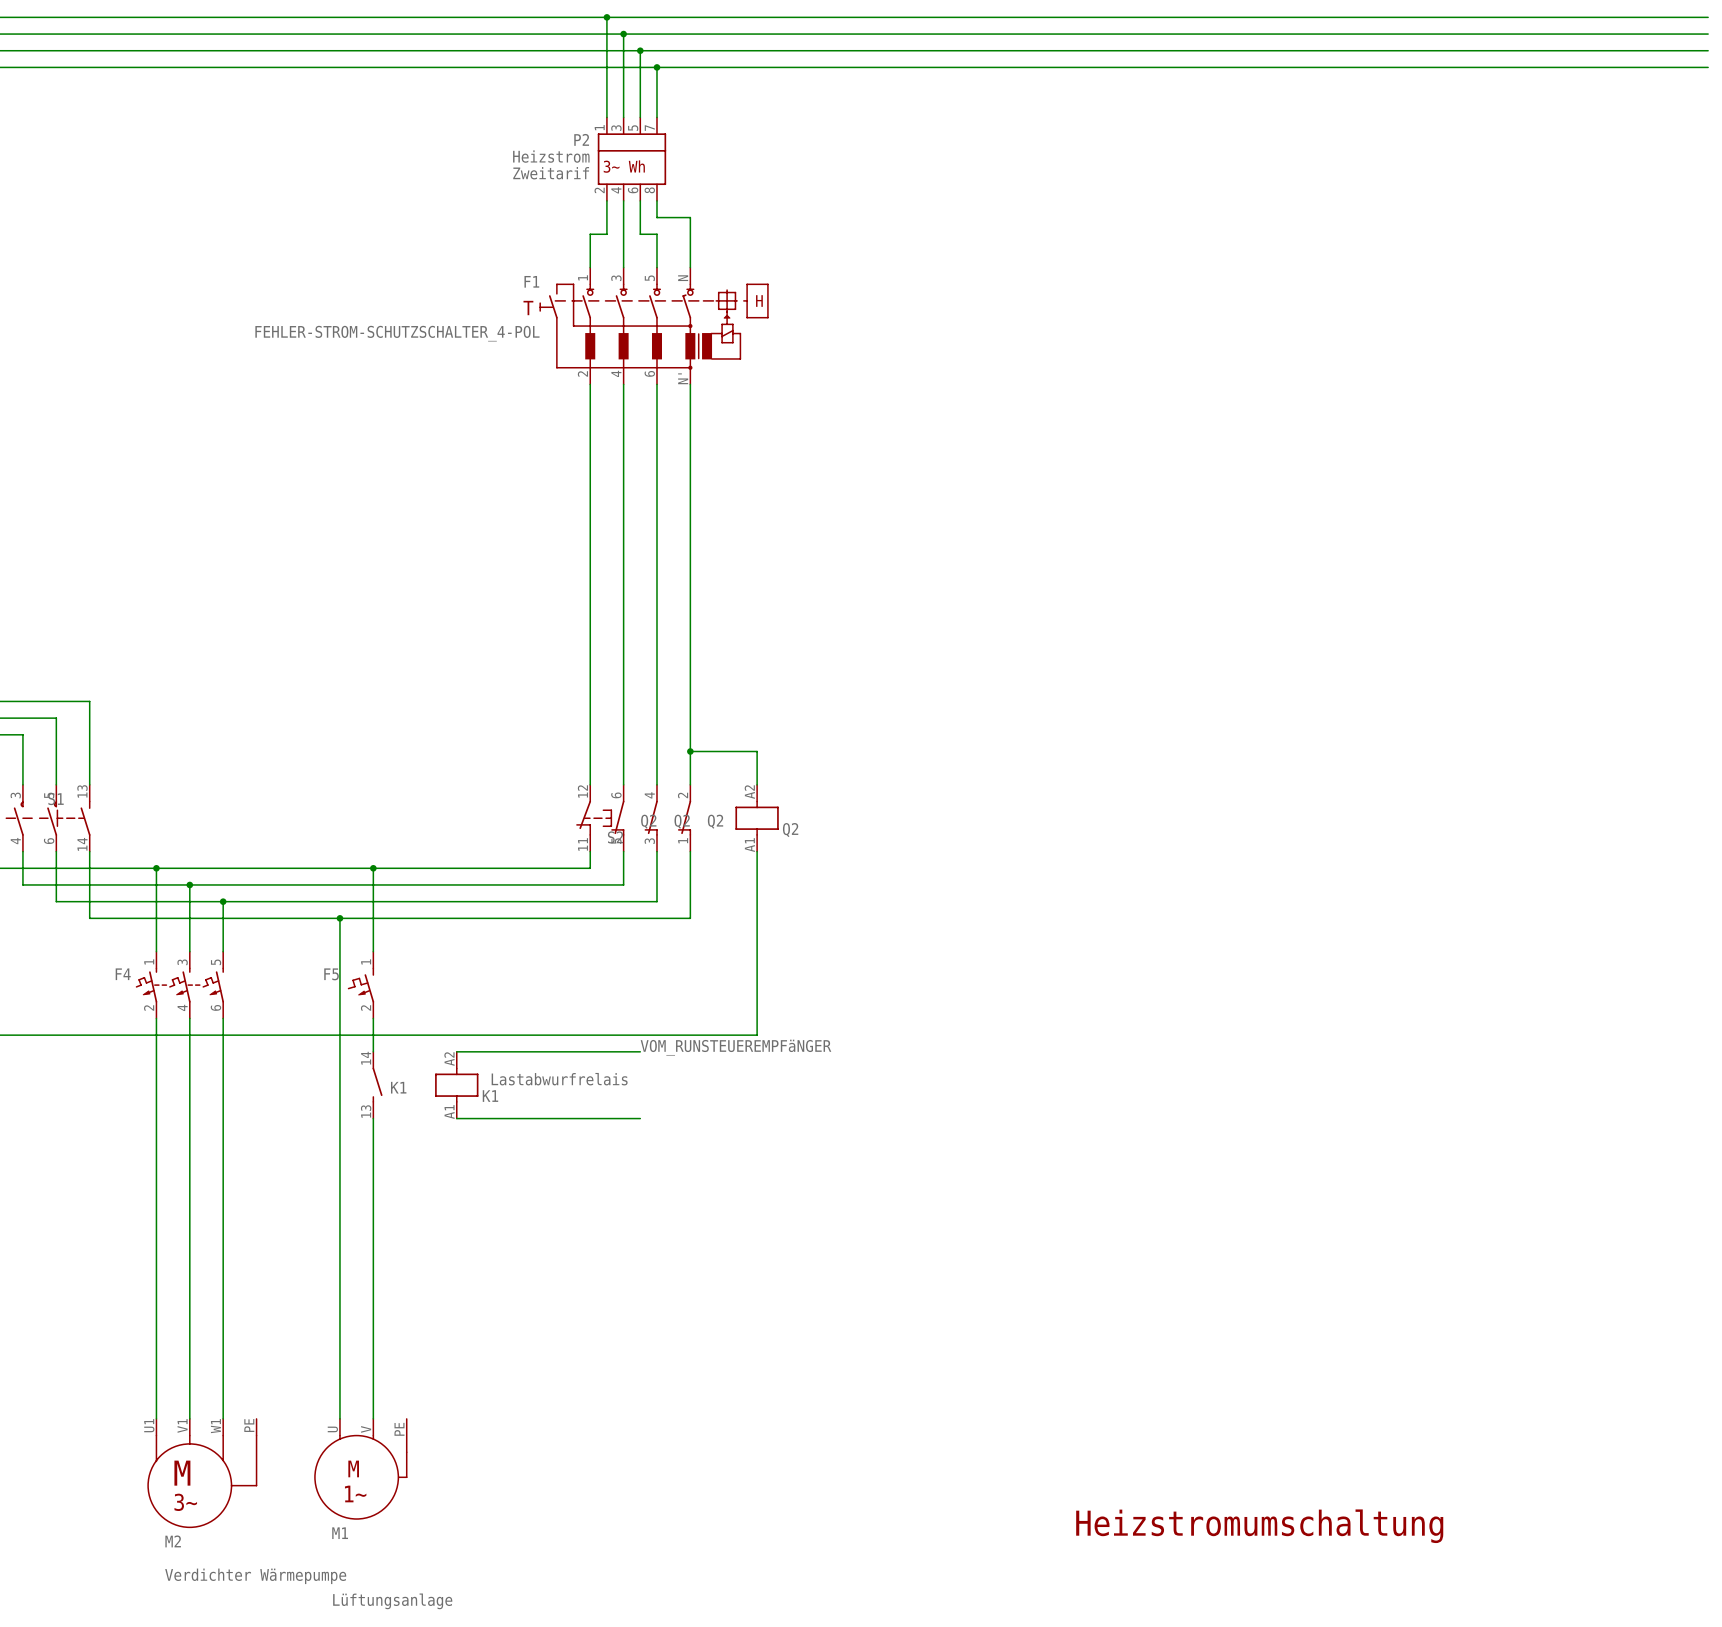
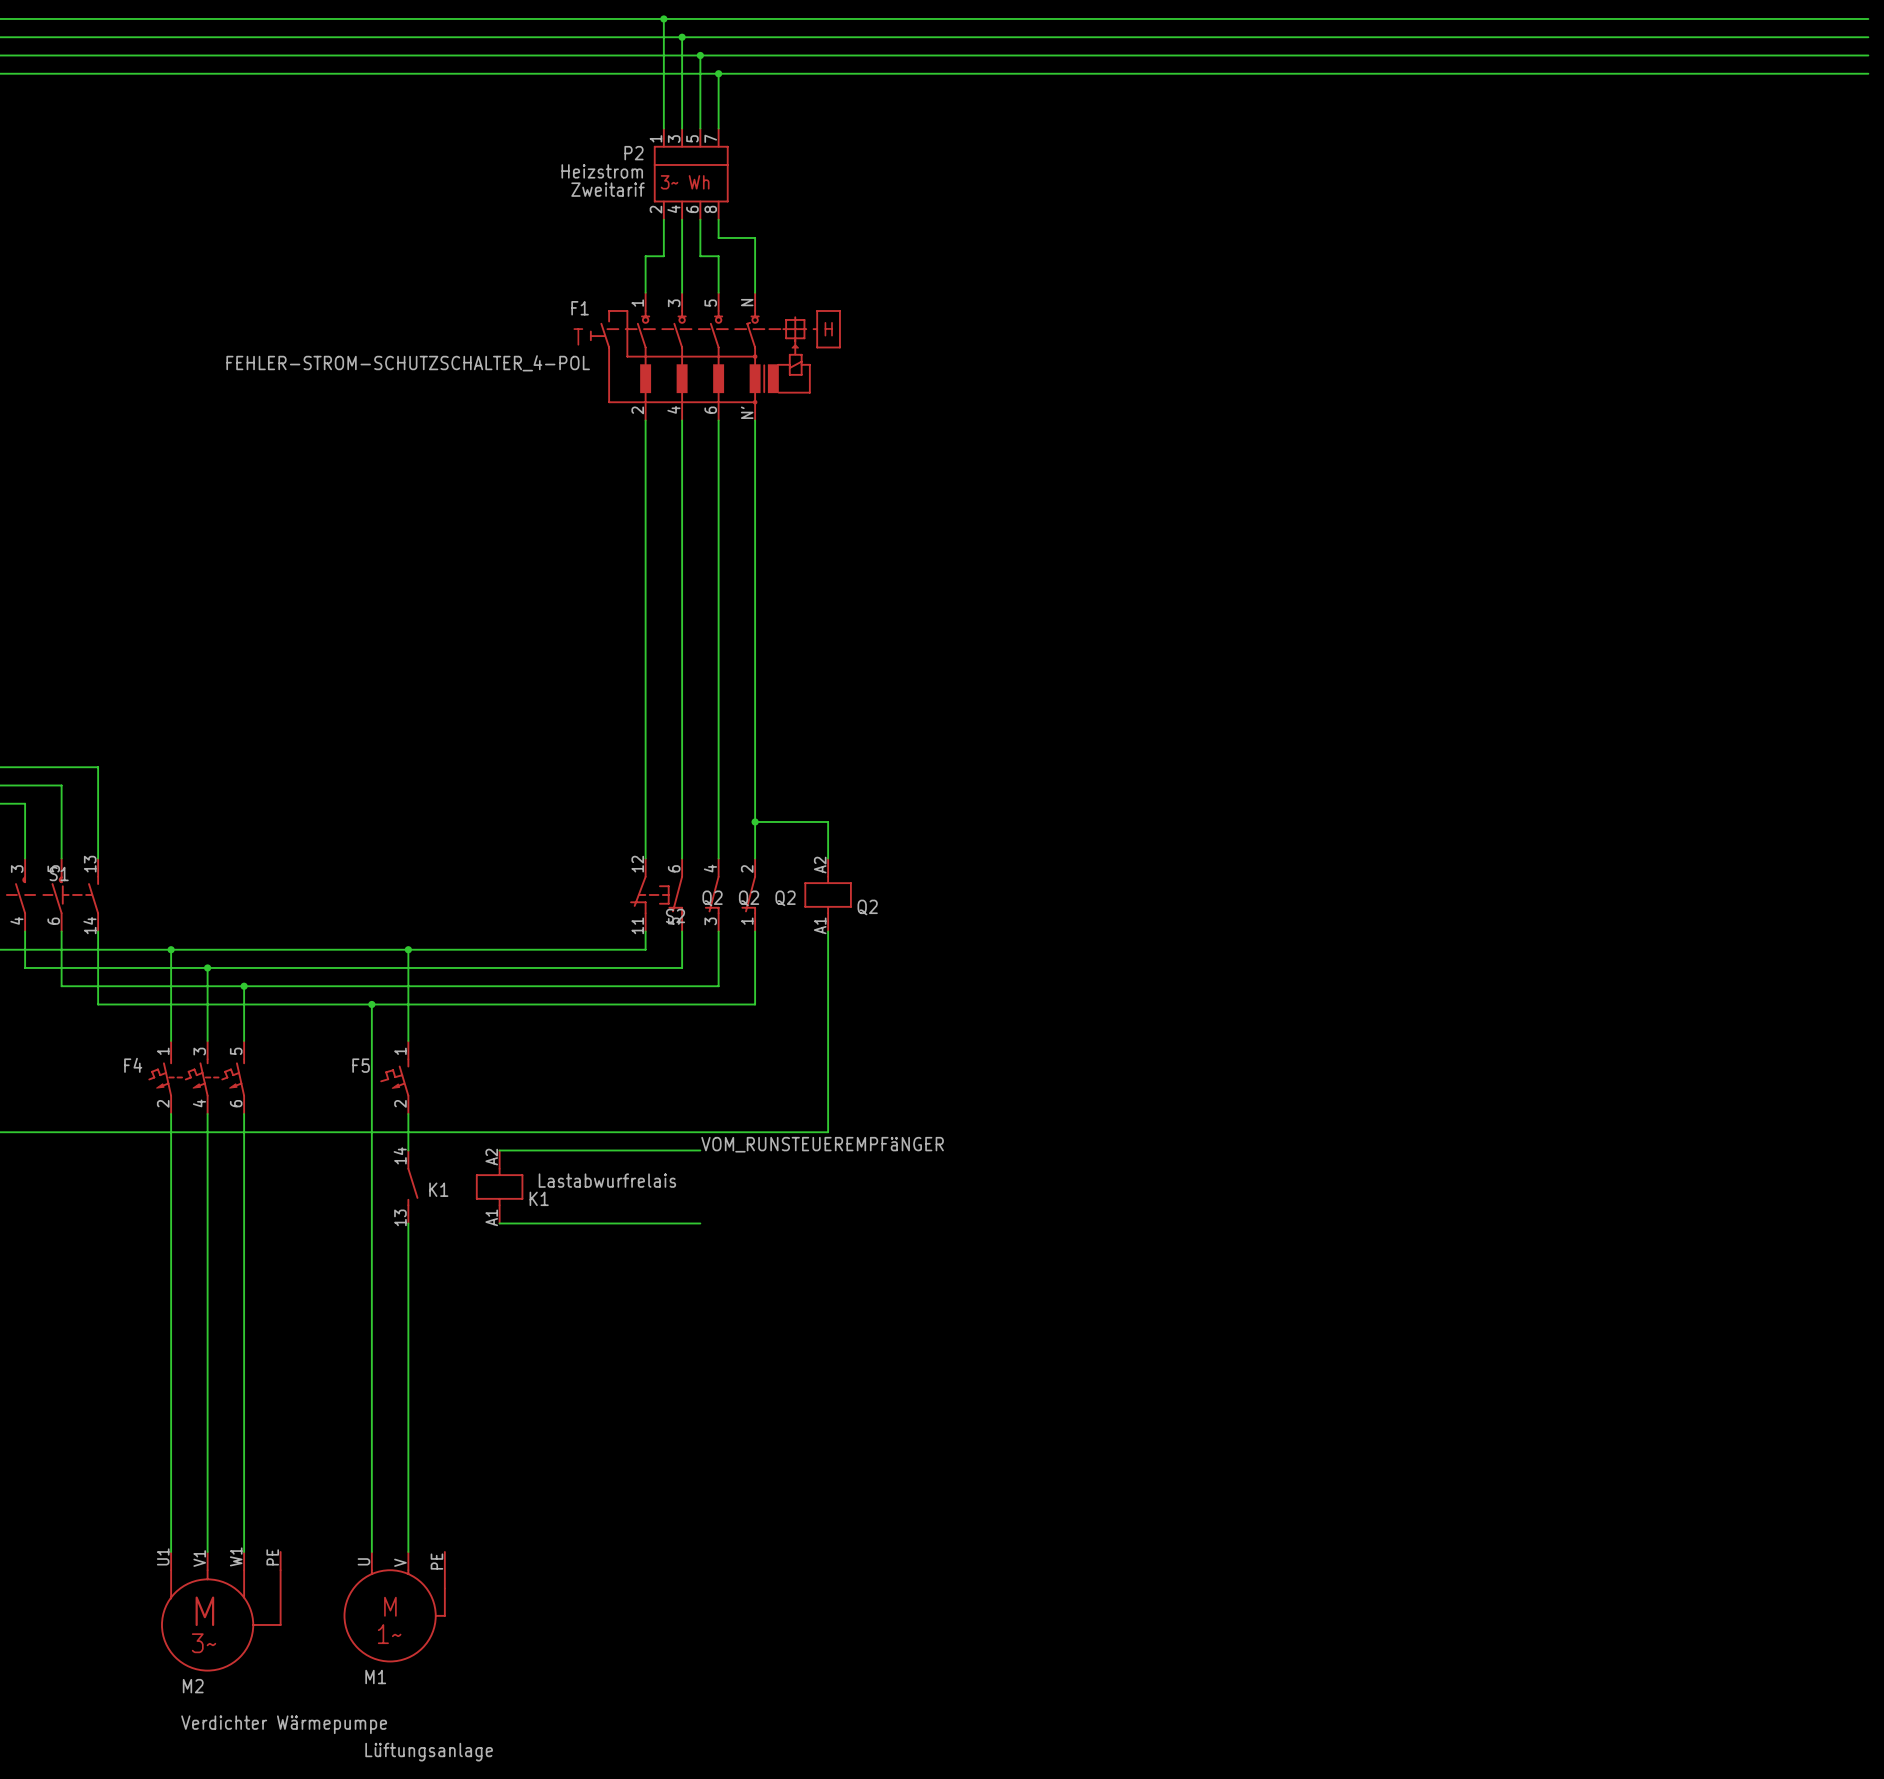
text: Heizstromumschaltung (1259, 1526) -> none

